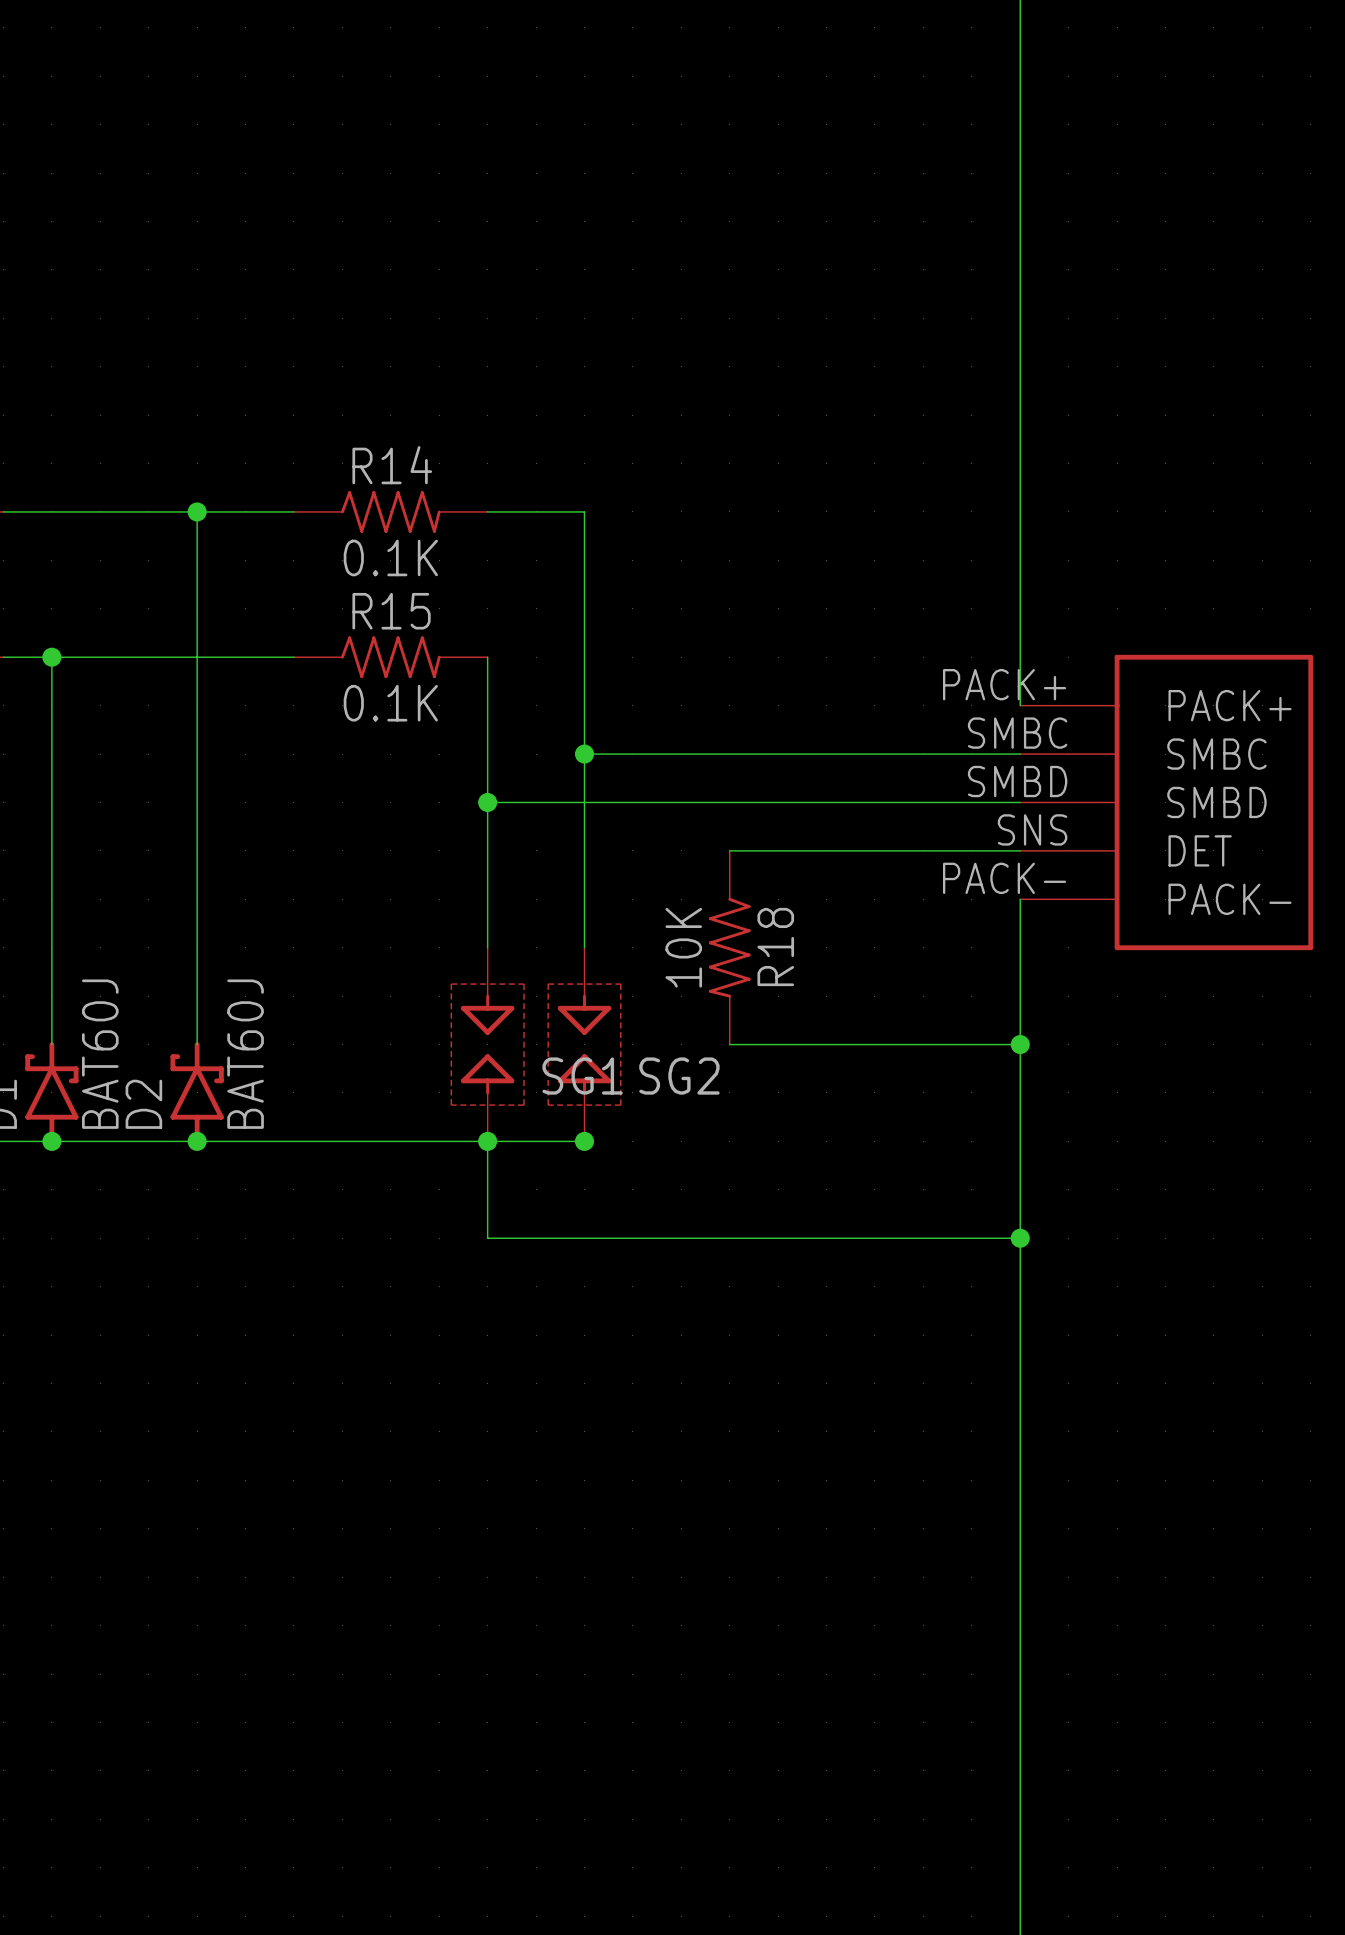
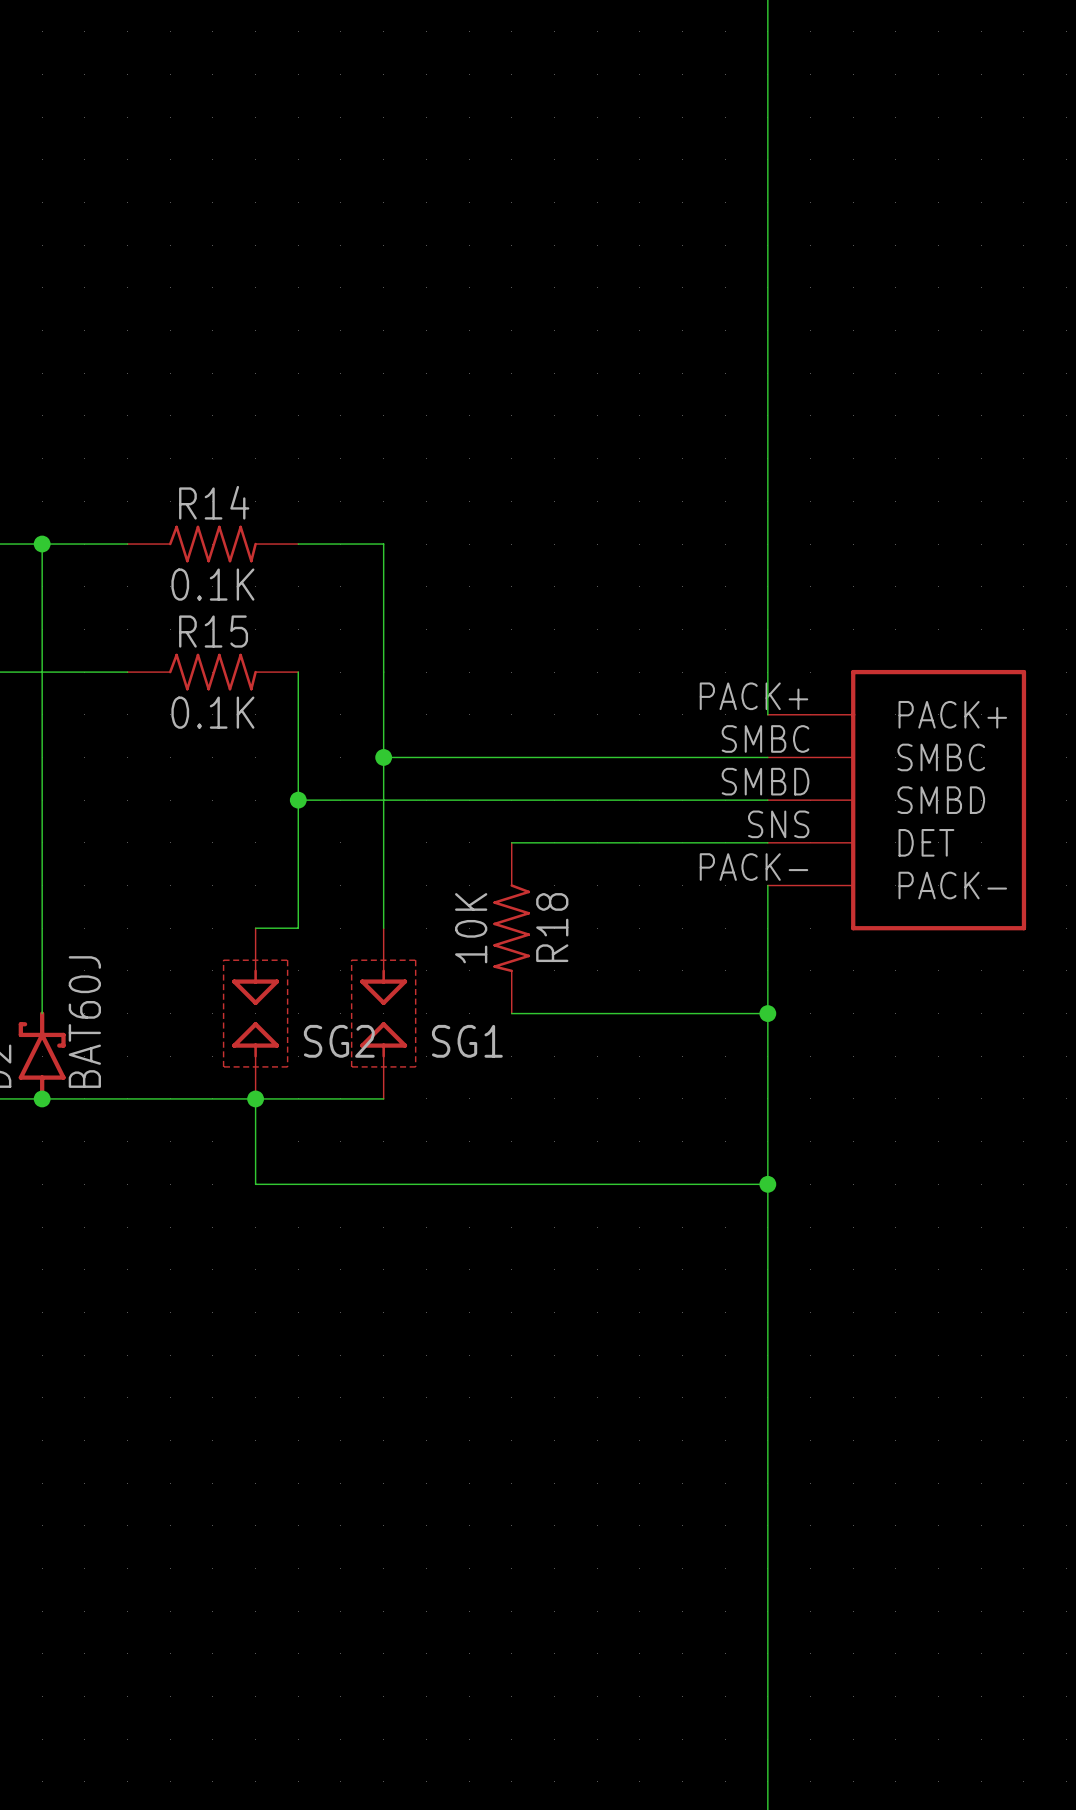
wire: none -> (255, 928) (298, 928)
SG2: none -> (255, 1013)
SG1: (487, 1044) -> none
SG2 name: SG2 (679, 1076) -> SG1 (467, 1041)
wire: (487, 1141) (487, 1238) -> (255, 1098) (255, 1184) (298, 1184)
junction position: (487, 1141) -> (255, 1098)
junction: (584, 1141) -> none

